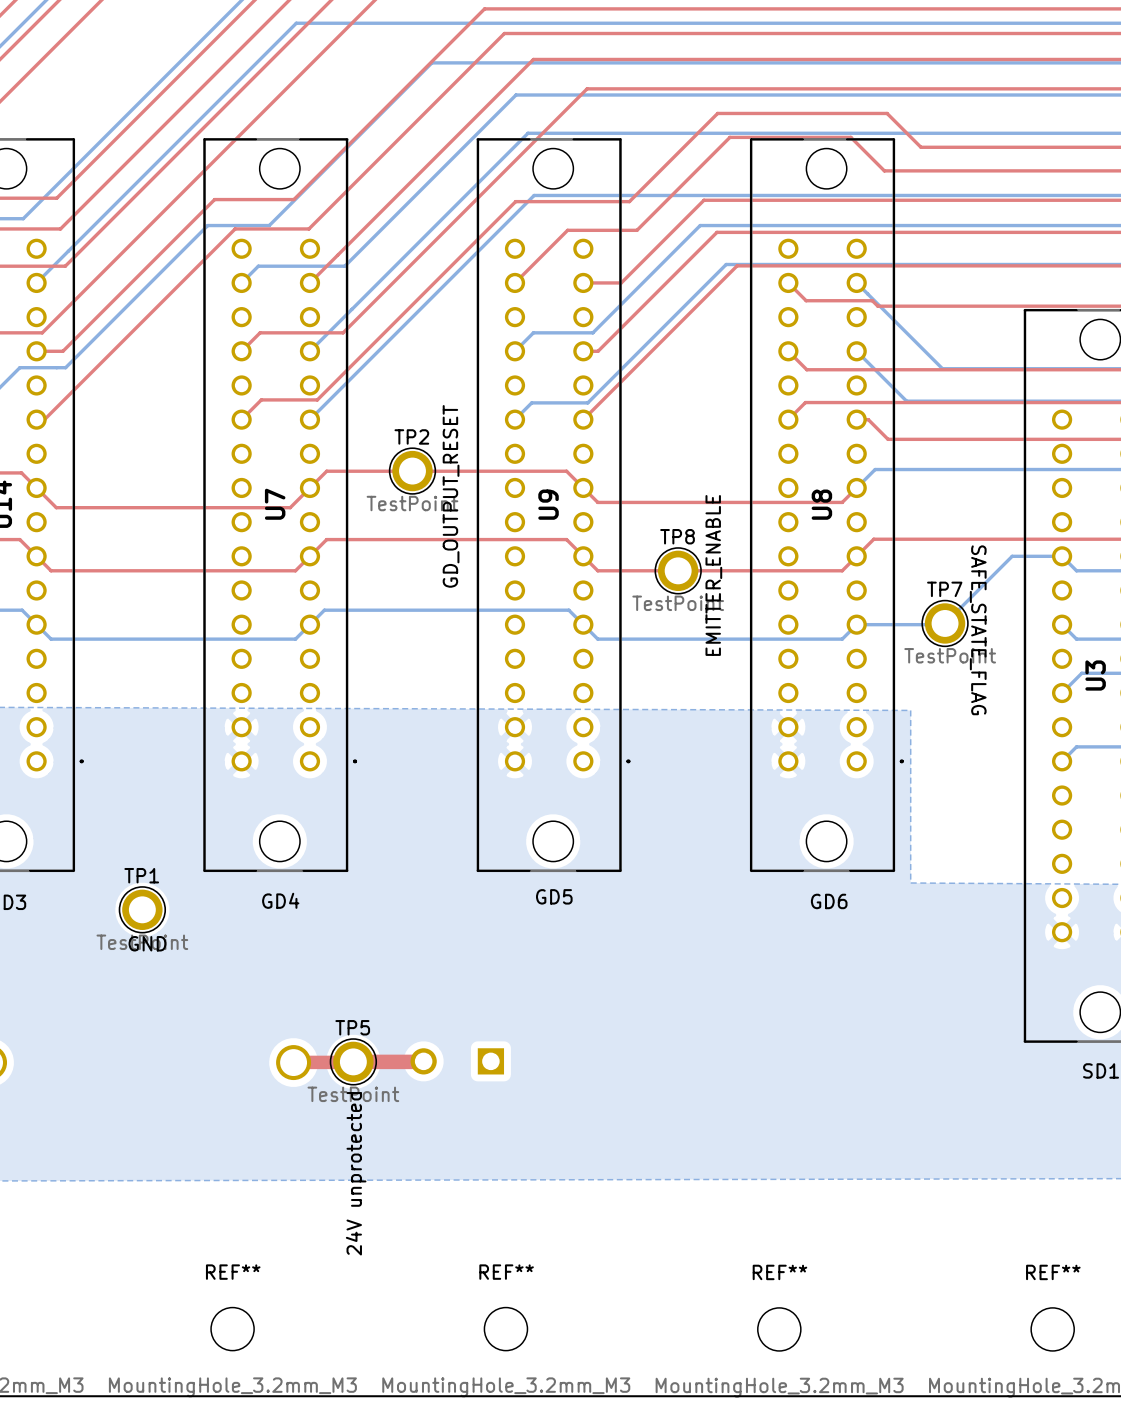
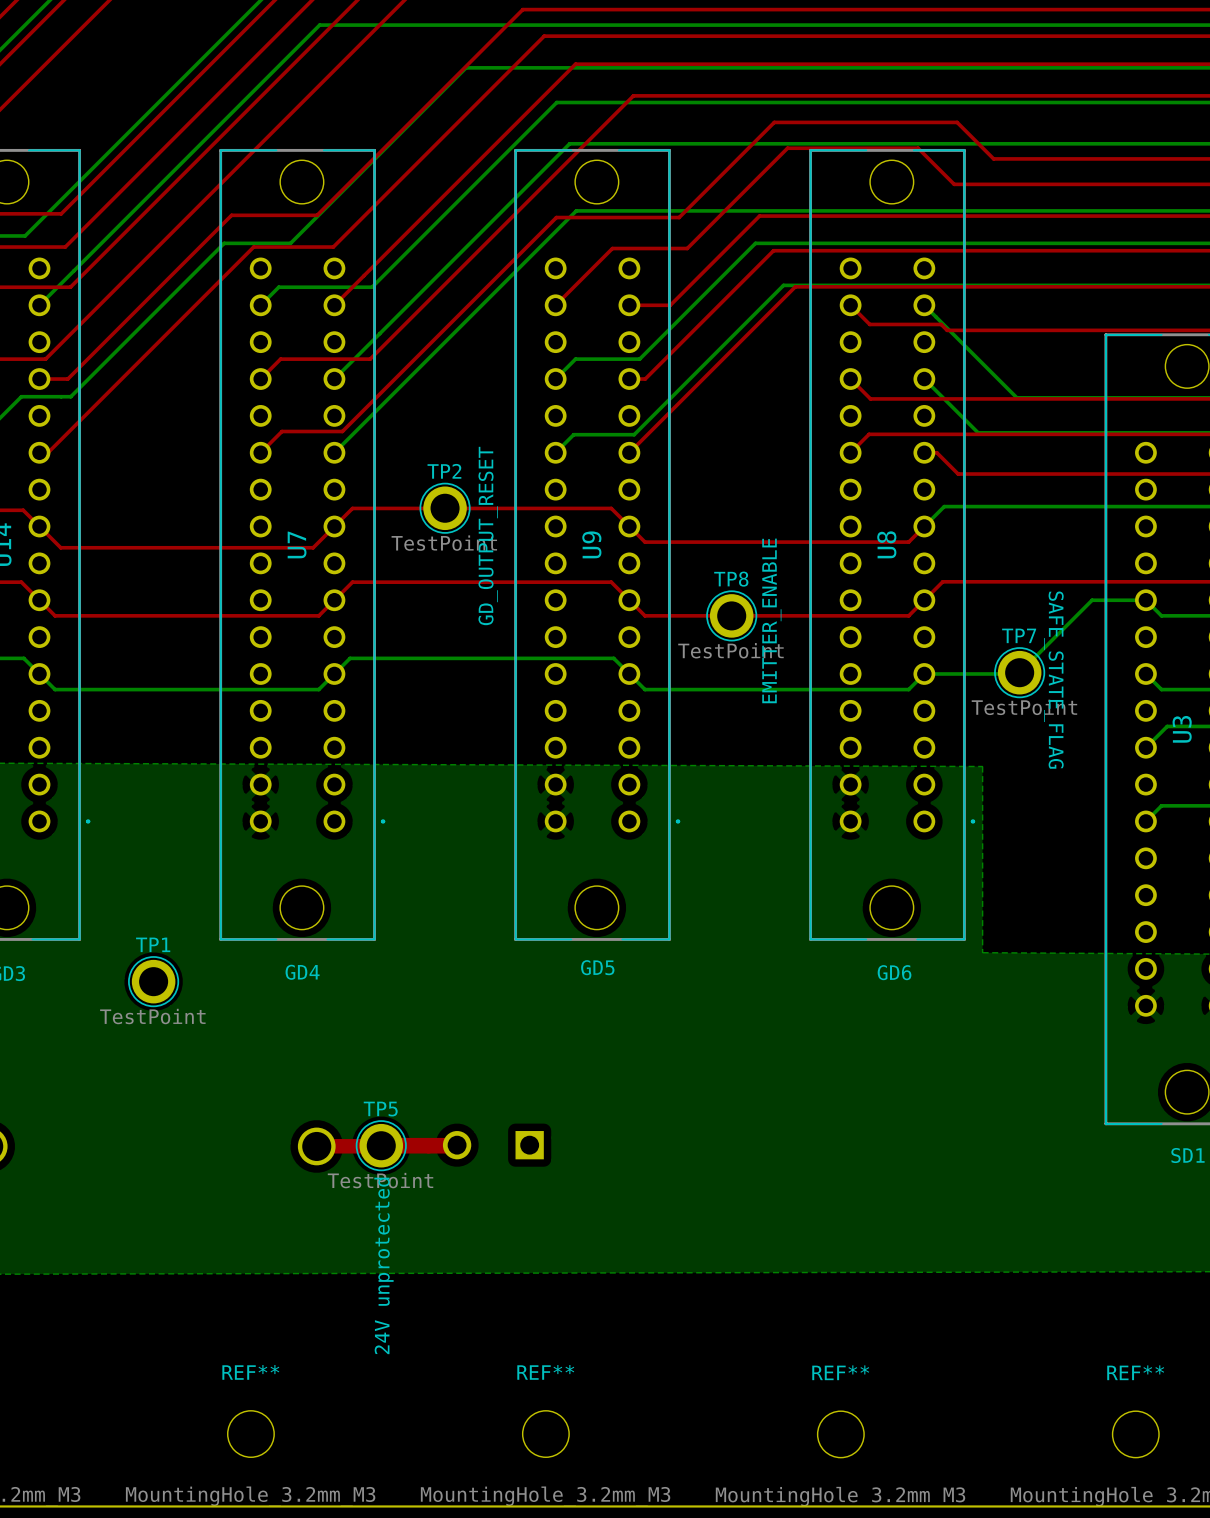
text: GND (147, 943) -> none

